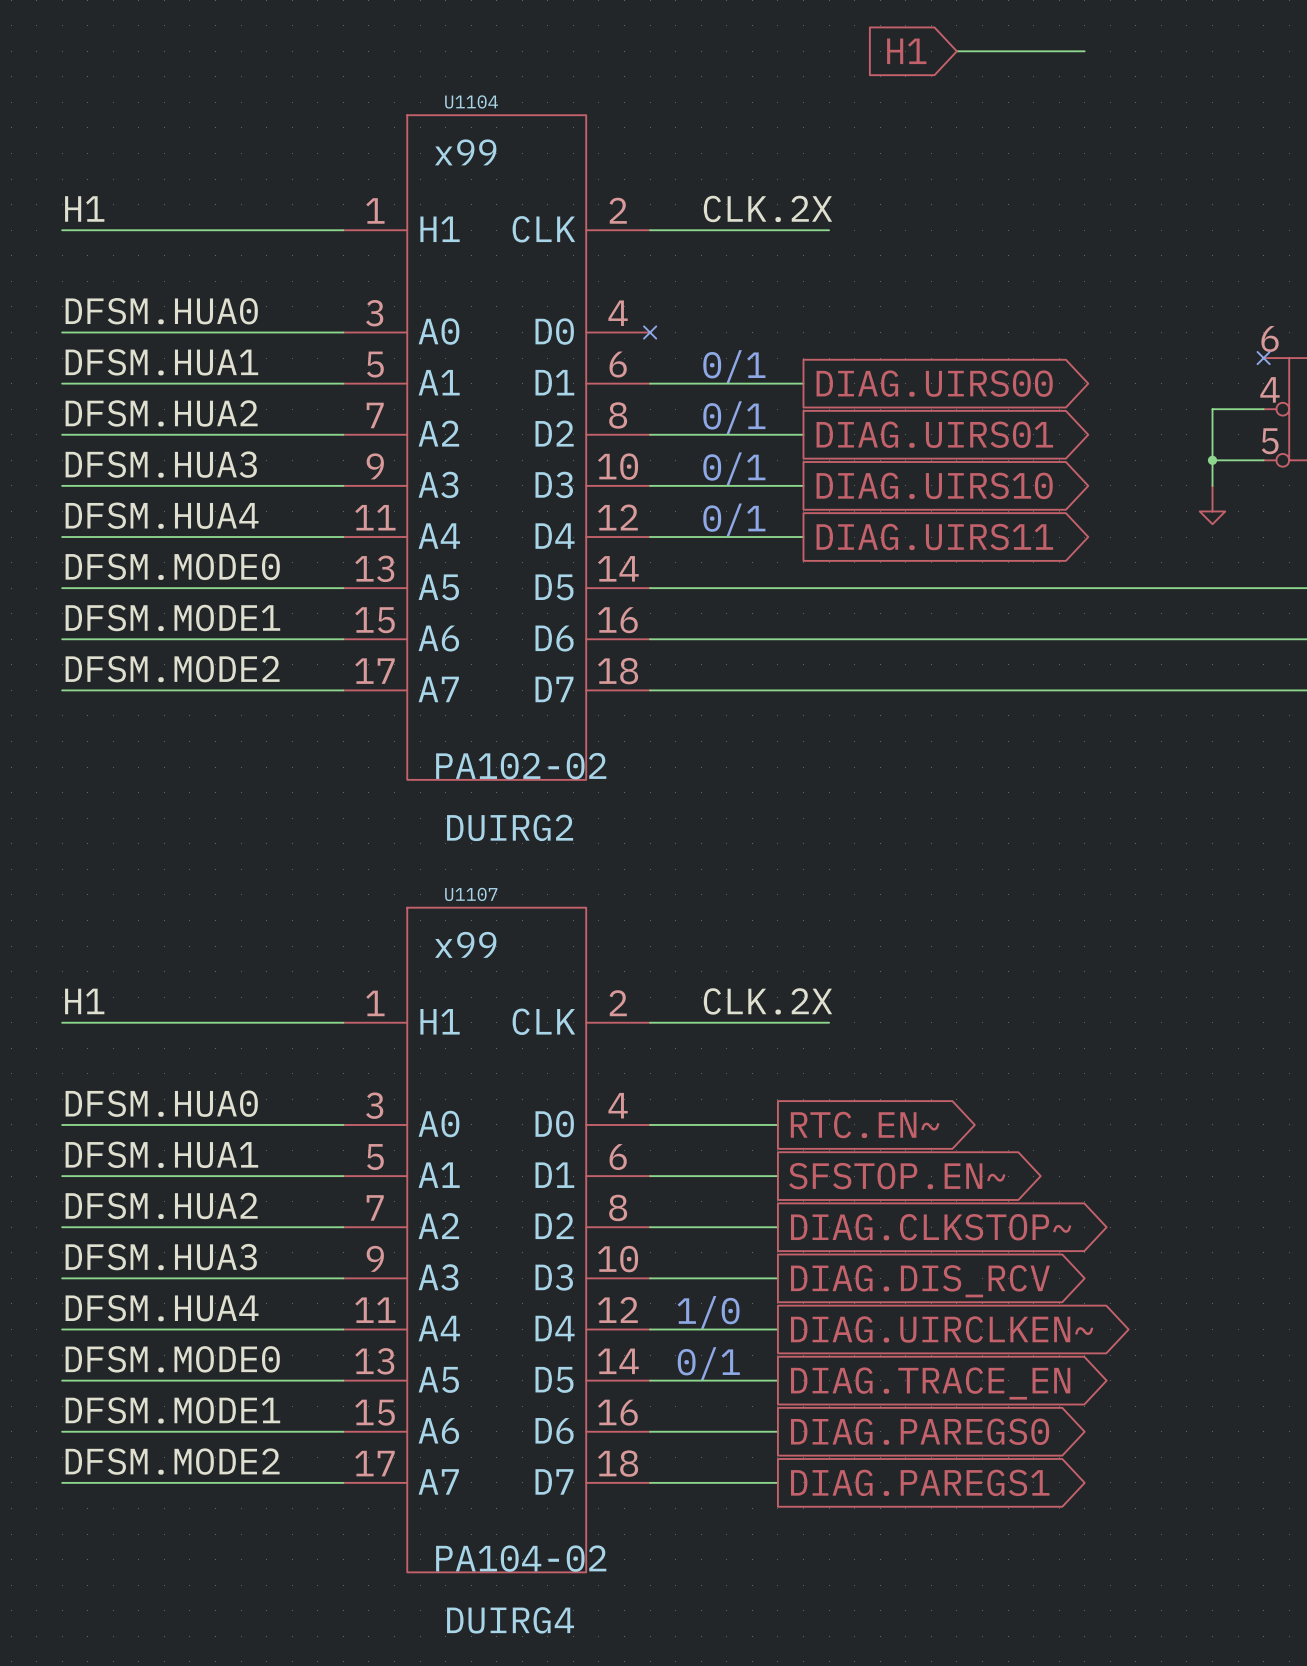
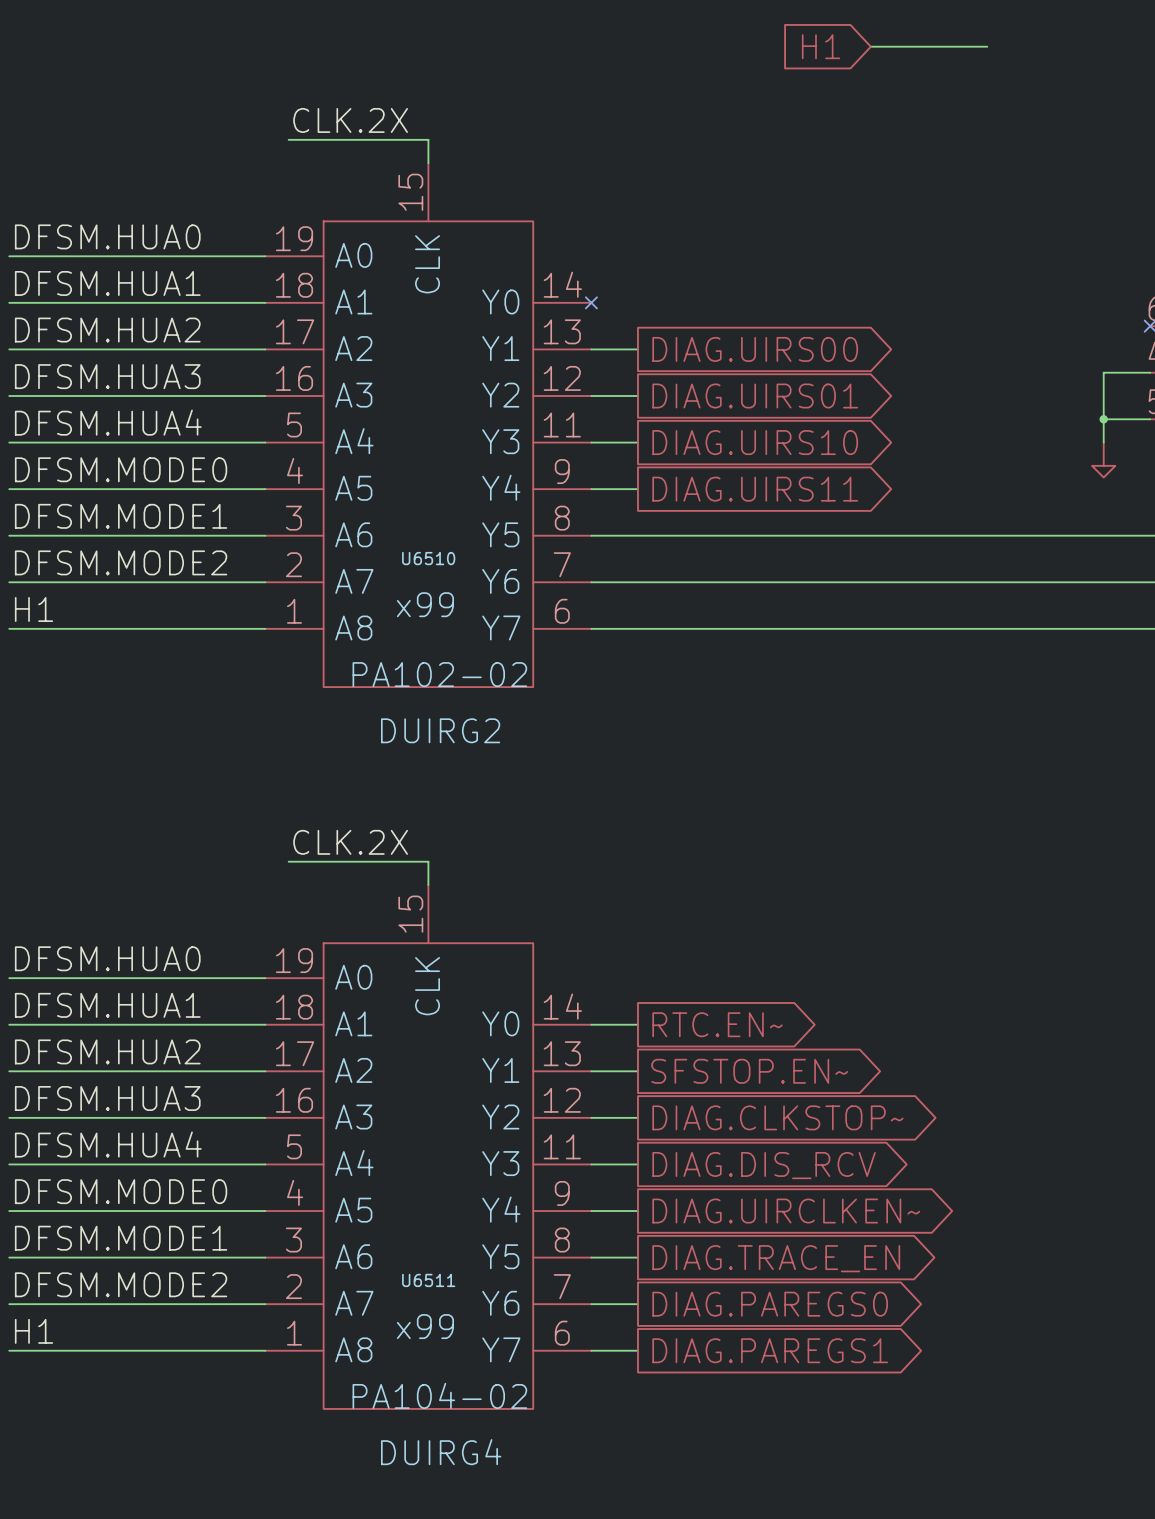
label: none -> CLK.2X (350, 120)
wire: none -> (288, 139) (428, 139) (428, 163)
label: H1 (84, 208) -> none
label: CLK.2X (767, 208) -> none
wire: (62, 230) (343, 230) -> (9, 256) (265, 256)
wire: (650, 230) (829, 230) -> none
label position: DFSM.HUA0 (161, 311) -> DFSM.HUA0 (107, 236)
wire: none -> (9, 302) (55, 302)
label position: DFSM.HUA1 (161, 362) -> DFSM.HUA1 (107, 283)
text: 0/1 (734, 366) -> none
wire: none -> (9, 349) (55, 349)
wire: (701, 383) (803, 383) -> none
global label position: DIAG.UIRS00 (934, 383) -> DIAG.UIRS00 (755, 349)
label position: DFSM.HUA2 (161, 413) -> DFSM.HUA2 (107, 330)
text: 0/1 (734, 417) -> none
wire: none -> (9, 396) (55, 396)
wire: (701, 434) (803, 434) -> none
global label position: DIAG.UIRS01 (934, 434) -> DIAG.UIRS01 (755, 396)
U1104: PA102-02 (496, 447) -> none
label position: DFSM.HUA3 (161, 464) -> DFSM.HUA3 (107, 376)
U6510: none -> PA102-02 (428, 425)
text: 0/1 (734, 468) -> none
wire: none -> (9, 442) (55, 442)
wire: (701, 485) (803, 485) -> none
global label position: DIAG.UIRS10 (934, 485) -> DIAG.UIRS10 (755, 442)
label position: DFSM.HUA4 (162, 515) -> DFSM.HUA4 (108, 422)
text: 0/1 (734, 519) -> none
wire: none -> (9, 489) (55, 489)
wire: (701, 537) (803, 537) -> none
global label position: DIAG.UIRS11 (934, 537) -> DIAG.UIRS11 (755, 489)
label position: DFSM.MODE0 (172, 566) -> DFSM.MODE0 (121, 469)
wire: none -> (9, 535) (55, 535)
label position: DFSM.MODE1 (172, 617) -> DFSM.MODE1 (121, 516)
wire: none -> (9, 582) (55, 582)
label: none -> H1 (34, 609)
label position: DFSM.MODE2 (172, 669) -> DFSM.MODE2 (121, 562)
wire: none -> (9, 628) (55, 628)
label: none -> CLK.2X (350, 842)
wire: none -> (288, 861) (428, 861) (428, 885)
label: H1 (84, 1001) -> none
label: CLK.2X (767, 1001) -> none
wire: (62, 1022) (343, 1022) -> (9, 978) (265, 978)
wire: (650, 1022) (829, 1022) -> none
label position: DFSM.HUA0 (161, 1103) -> DFSM.HUA0 (107, 958)
wire: none -> (9, 1024) (55, 1024)
wire: (701, 1124) (777, 1124) -> none
global label position: RTC.EN~ (865, 1124) -> RTC.EN~ (717, 1024)
label position: DFSM.HUA1 (161, 1154) -> DFSM.HUA1 (107, 1005)
wire: none -> (9, 1071) (55, 1071)
wire: (701, 1176) (777, 1176) -> none
global label position: SFSTOP.EN~ (897, 1176) -> SFSTOP.EN~ (749, 1071)
label position: DFSM.HUA2 (161, 1205) -> DFSM.HUA2 (107, 1051)
wire: none -> (9, 1117) (55, 1117)
wire: (701, 1227) (777, 1227) -> none
global label position: DIAG.CLKSTOP~ (931, 1227) -> DIAG.CLKSTOP~ (777, 1117)
U1107: PA104-02 (496, 1240) -> none
label position: DFSM.HUA3 (161, 1257) -> DFSM.HUA3 (107, 1098)
U6511: none -> PA104-02 (428, 1146)
wire: none -> (9, 1164) (55, 1164)
wire: (701, 1278) (777, 1278) -> none
global label position: DIAG.DIS_RCV (920, 1281) -> DIAG.DIS_RCV (764, 1165)
label position: DFSM.HUA4 (162, 1308) -> DFSM.HUA4 (108, 1144)
text: 1/0 (708, 1312) -> none
wire: none -> (9, 1211) (55, 1211)
wire: (701, 1329) (777, 1329) -> none
global label position: DIAG.UIRCLKEN~ (942, 1329) -> DIAG.UIRCLKEN~ (786, 1211)
label position: DFSM.MODE0 (172, 1359) -> DFSM.MODE0 (121, 1191)
text: 0/1 (708, 1363) -> none
wire: none -> (9, 1257) (55, 1257)
wire: (701, 1380) (777, 1380) -> none
global label position: DIAG.TRACE_EN (930, 1383) -> DIAG.TRACE_EN (776, 1258)
label position: DFSM.MODE1 (172, 1410) -> DFSM.MODE1 (121, 1238)
wire: none -> (9, 1304) (55, 1304)
wire: (701, 1431) (777, 1431) -> none
global label position: DIAG.PAREGS0 (920, 1431) -> DIAG.PAREGS0 (770, 1304)
label: none -> H1 (34, 1331)
label position: DFSM.MODE2 (172, 1461) -> DFSM.MODE2 (121, 1284)
wire: none -> (9, 1350) (55, 1350)
wire: (701, 1482) (777, 1482) -> none
global label position: DIAG.PAREGS1 (920, 1482) -> DIAG.PAREGS1 (770, 1350)

